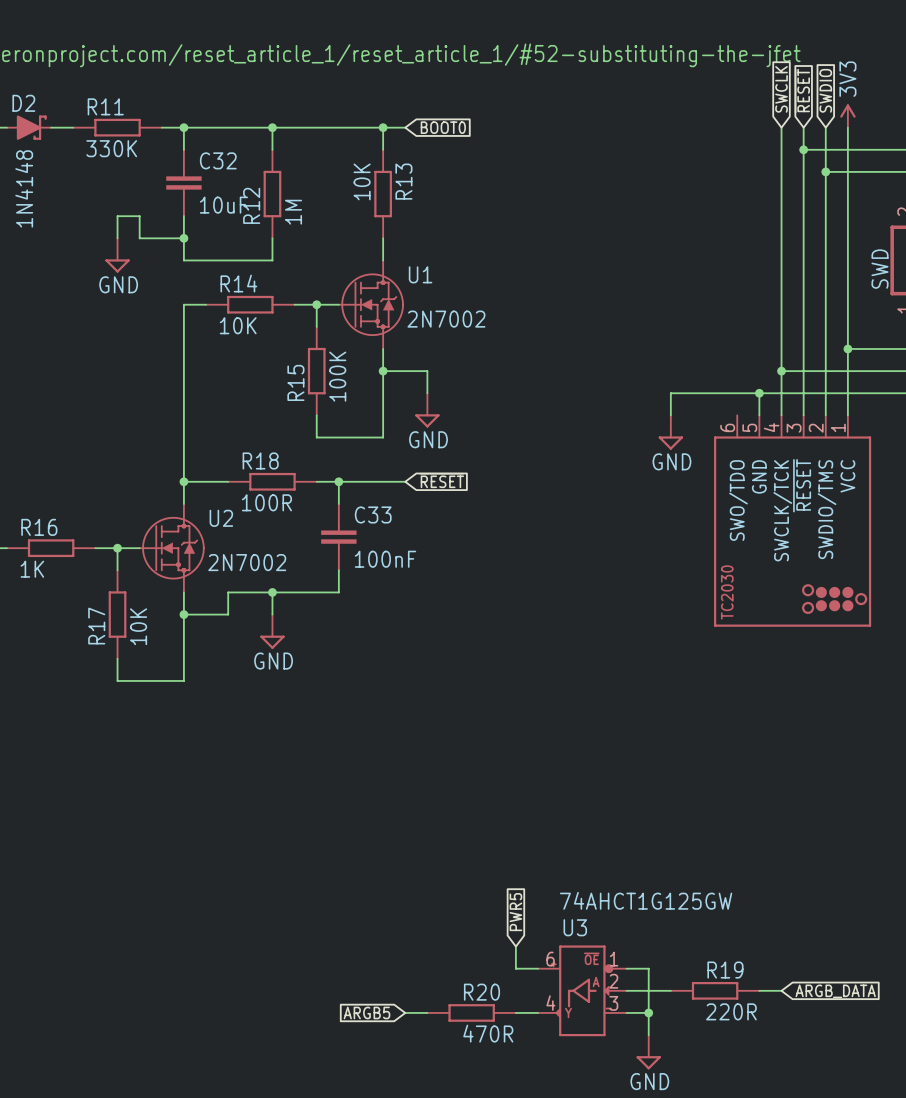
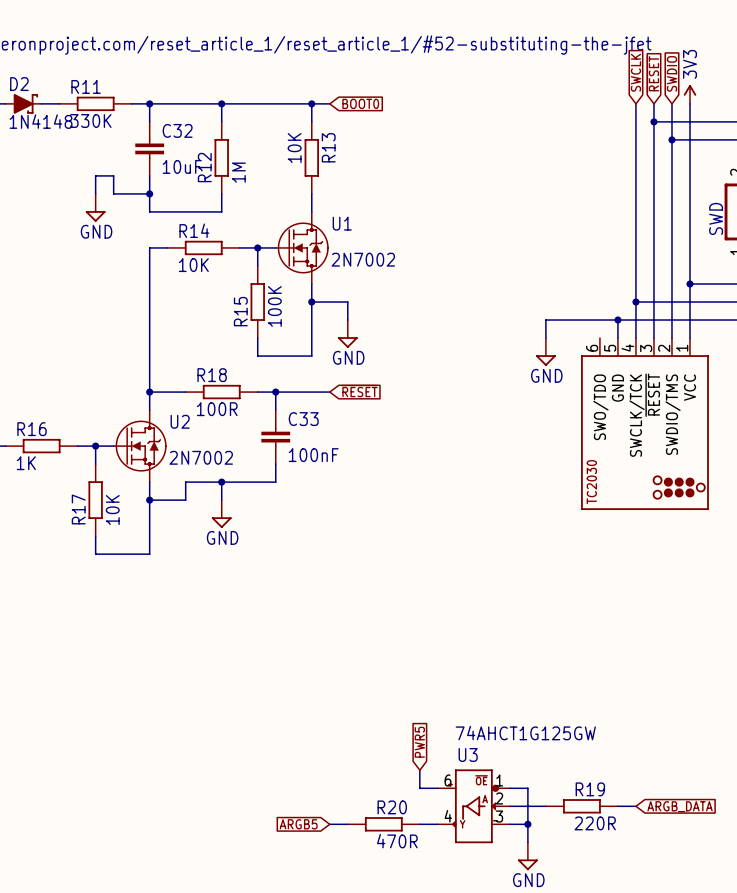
D2 value rotation: 0° (24, 188) -> 90° clockwise (41, 121)

